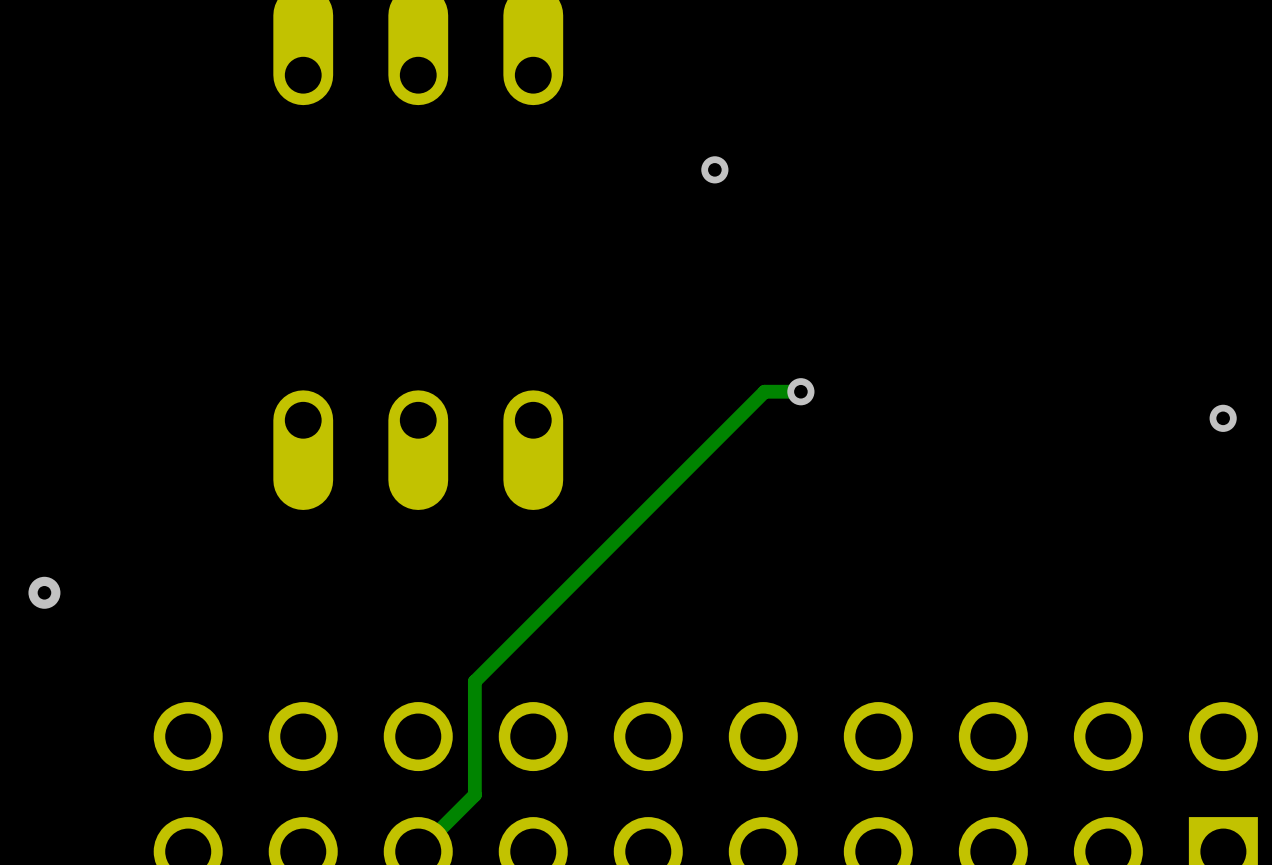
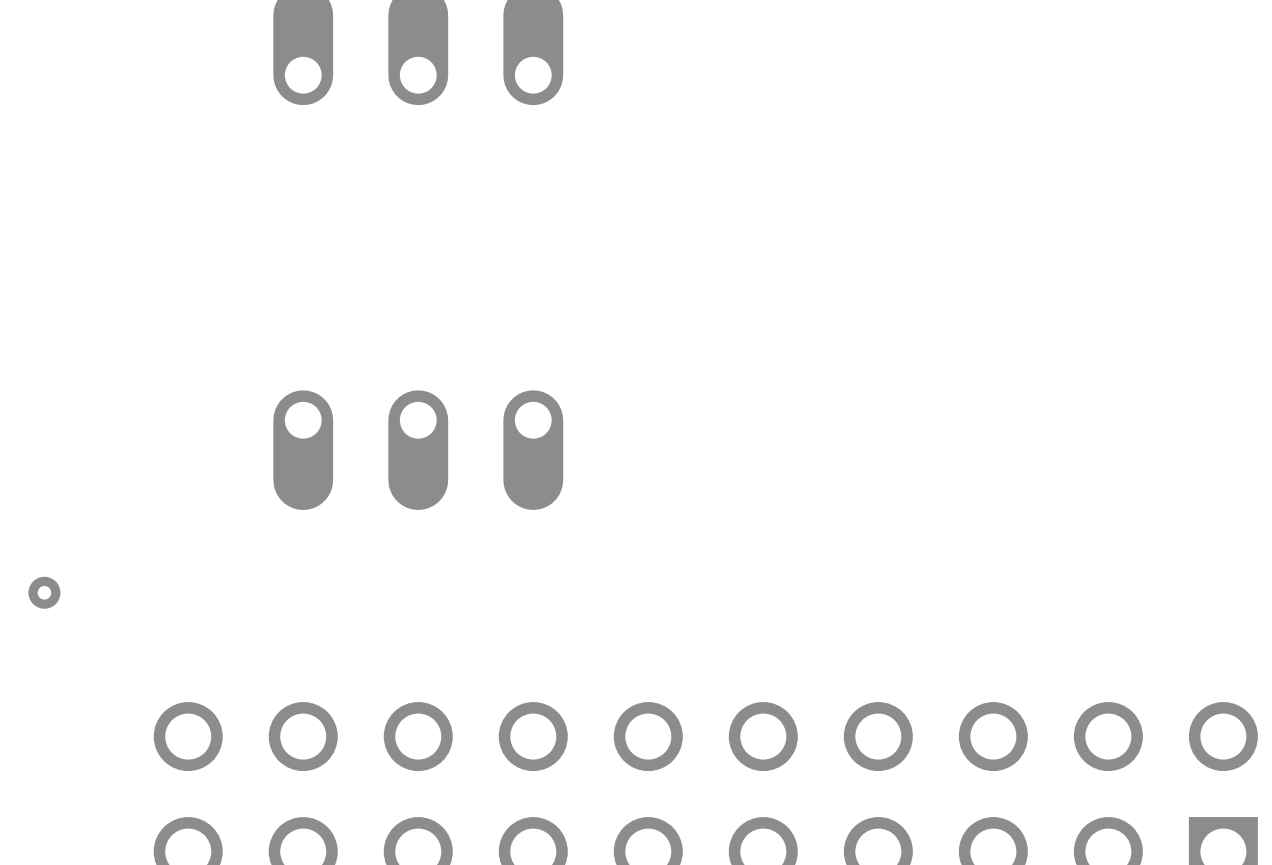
via: (714, 169) -> none
track: (800, 391) (764, 391) (474, 681) (474, 794) (418, 851) -> none
via: (800, 391) -> none
via: (1223, 418) -> none

